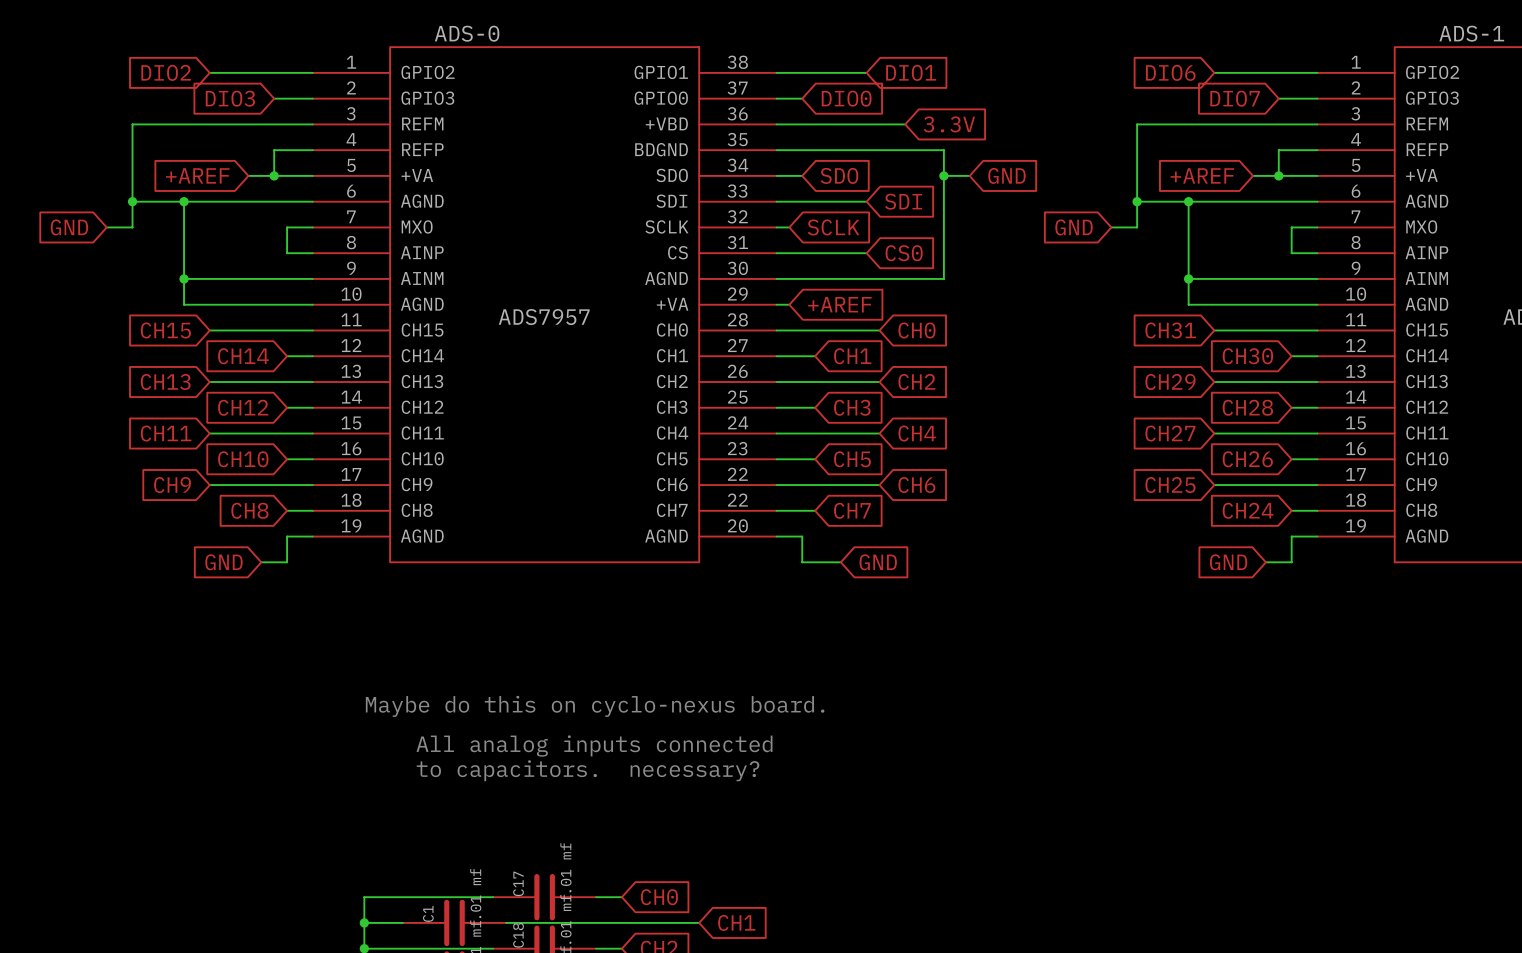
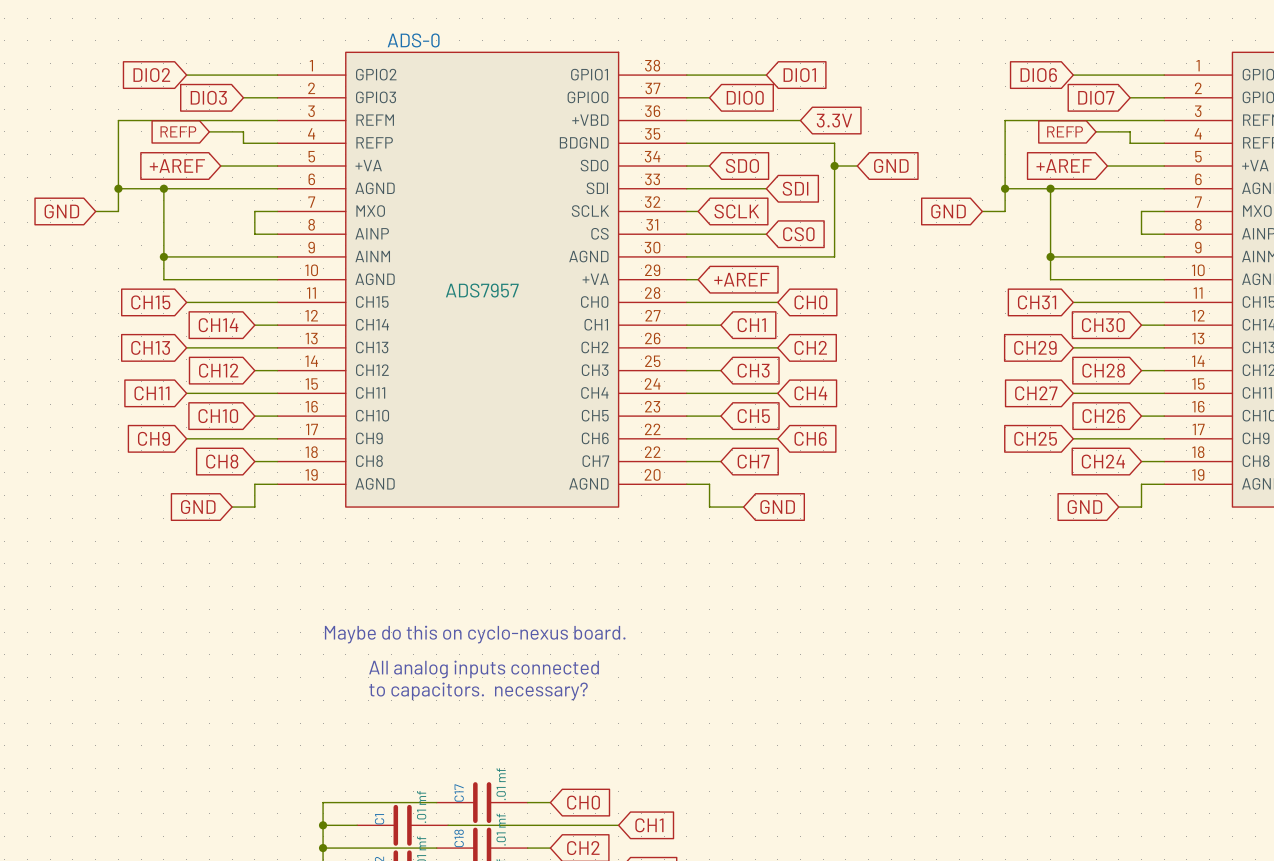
global label: none -> REFP (178, 131)
global label: none -> REFP (1065, 131)
wire: (274, 150) (274, 175) -> (243, 143) (243, 131) (209, 131)
wire: (1278, 150) (1278, 175) -> (1130, 143) (1130, 131) (1096, 131)
junction: (274, 175) -> none
junction: (1278, 175) -> none

